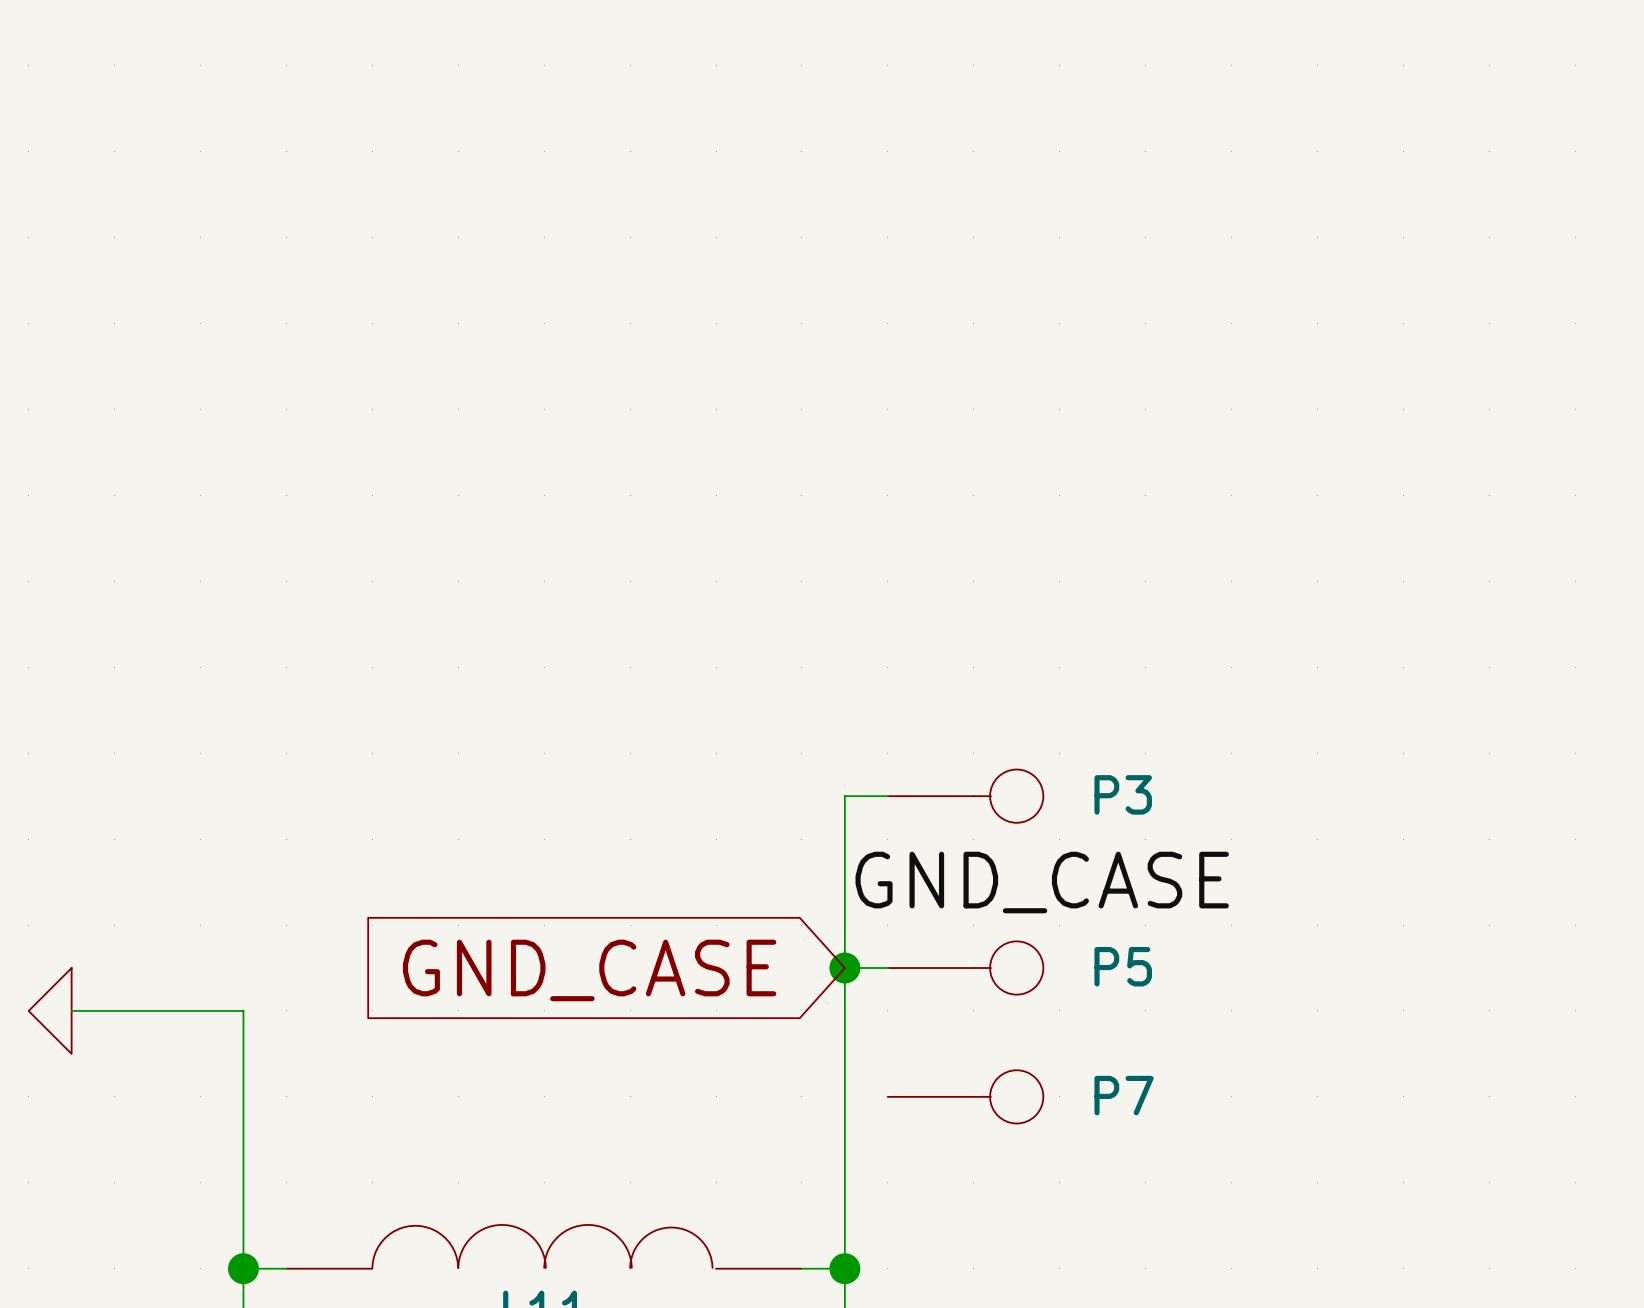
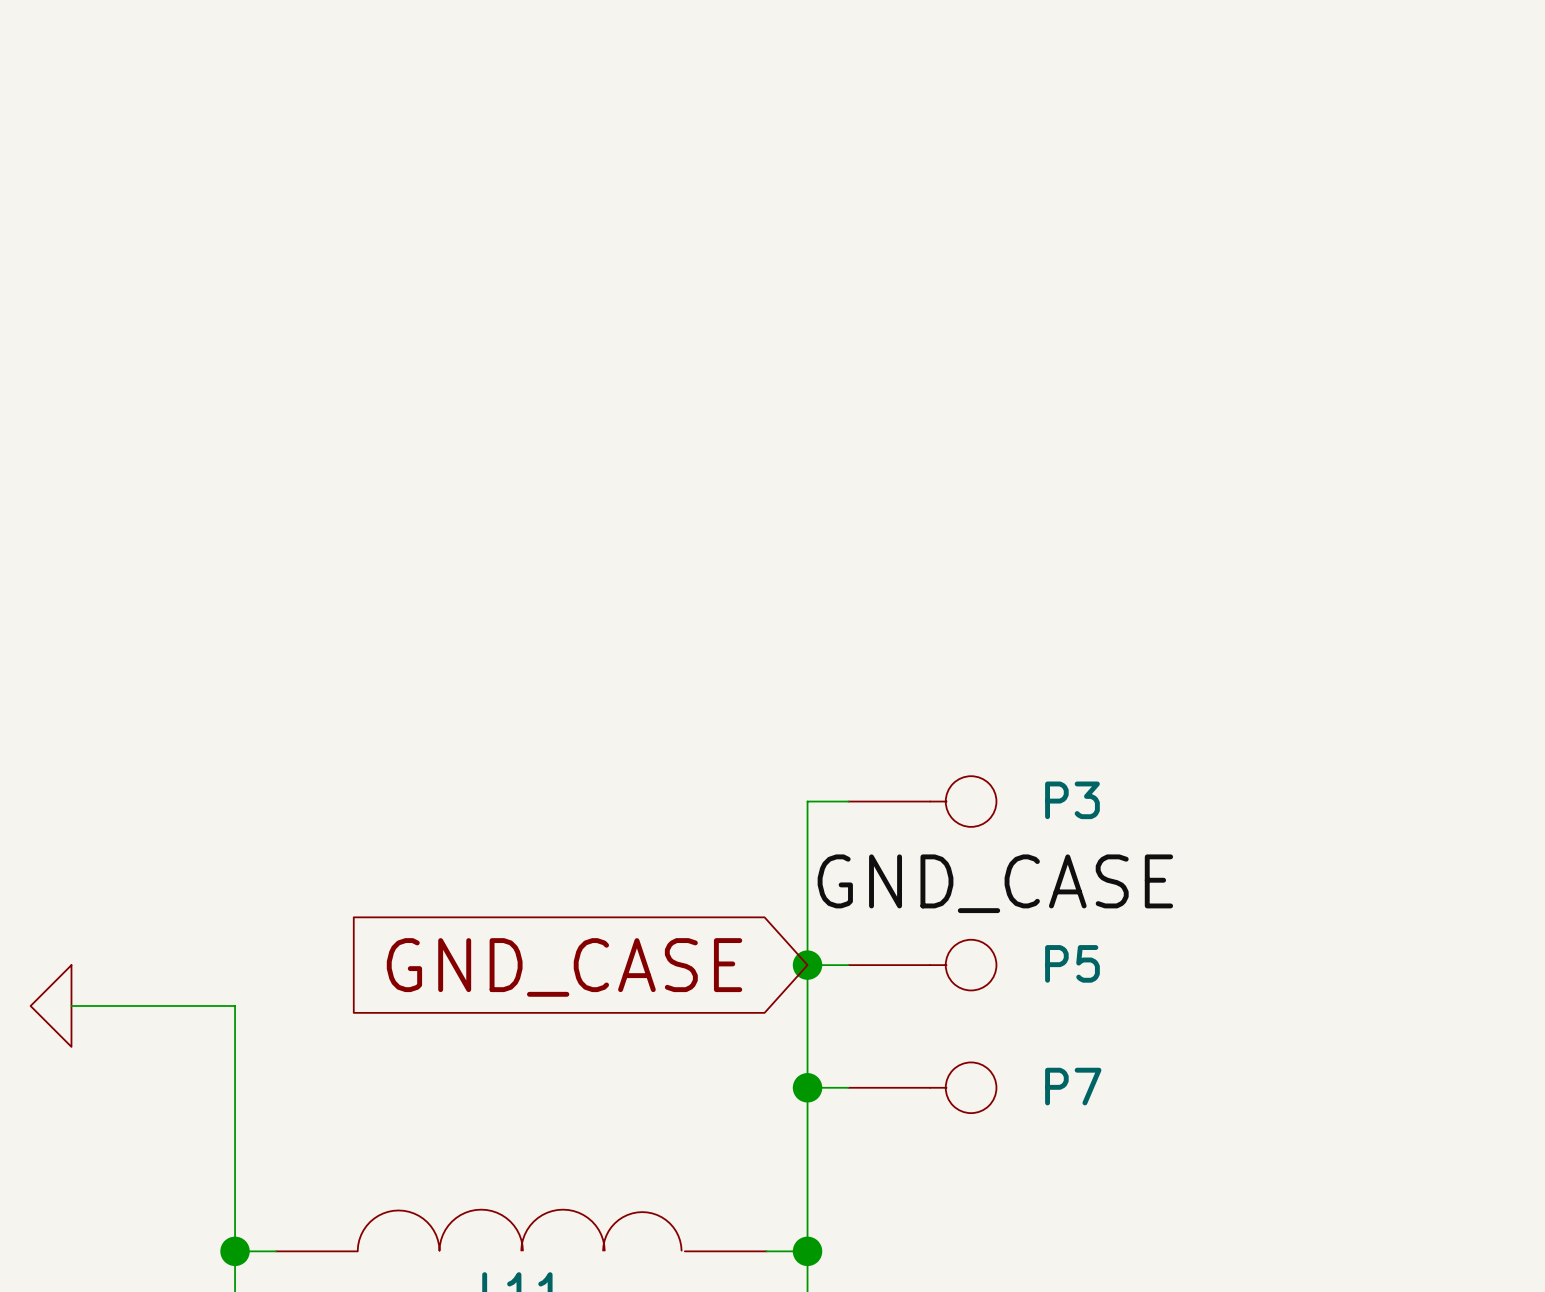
wire: none -> (807, 1087) (848, 1087)
junction: none -> (807, 1087)

